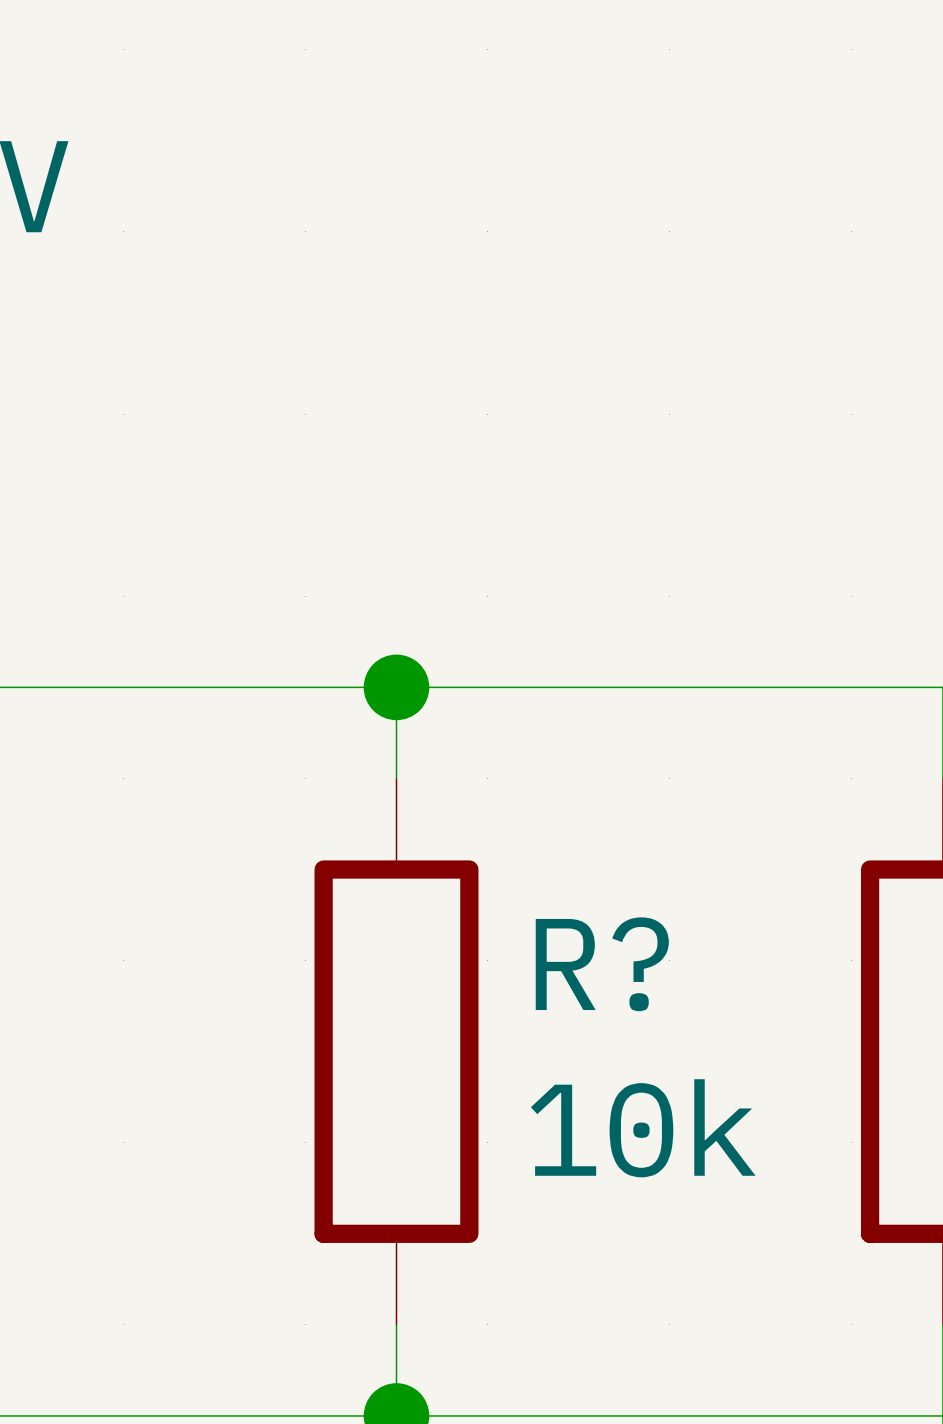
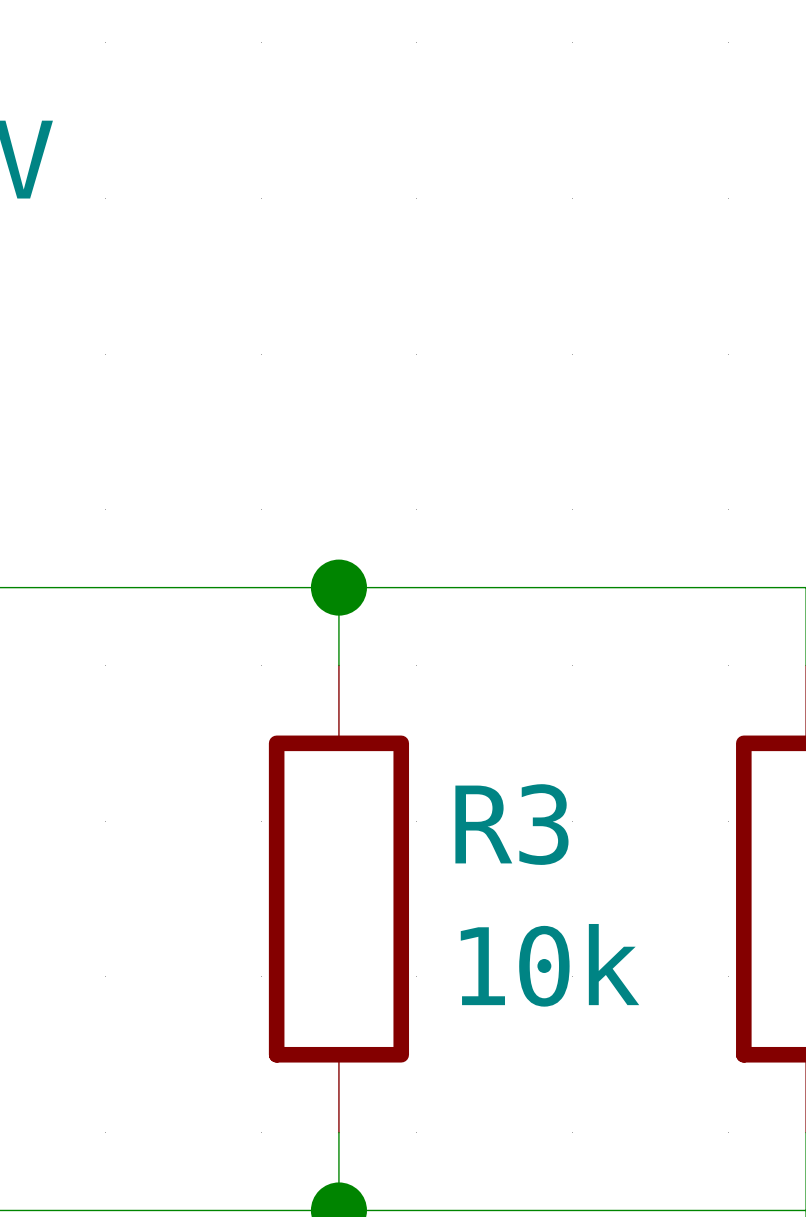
R? name: R? (602, 964) -> R3 (511, 824)

